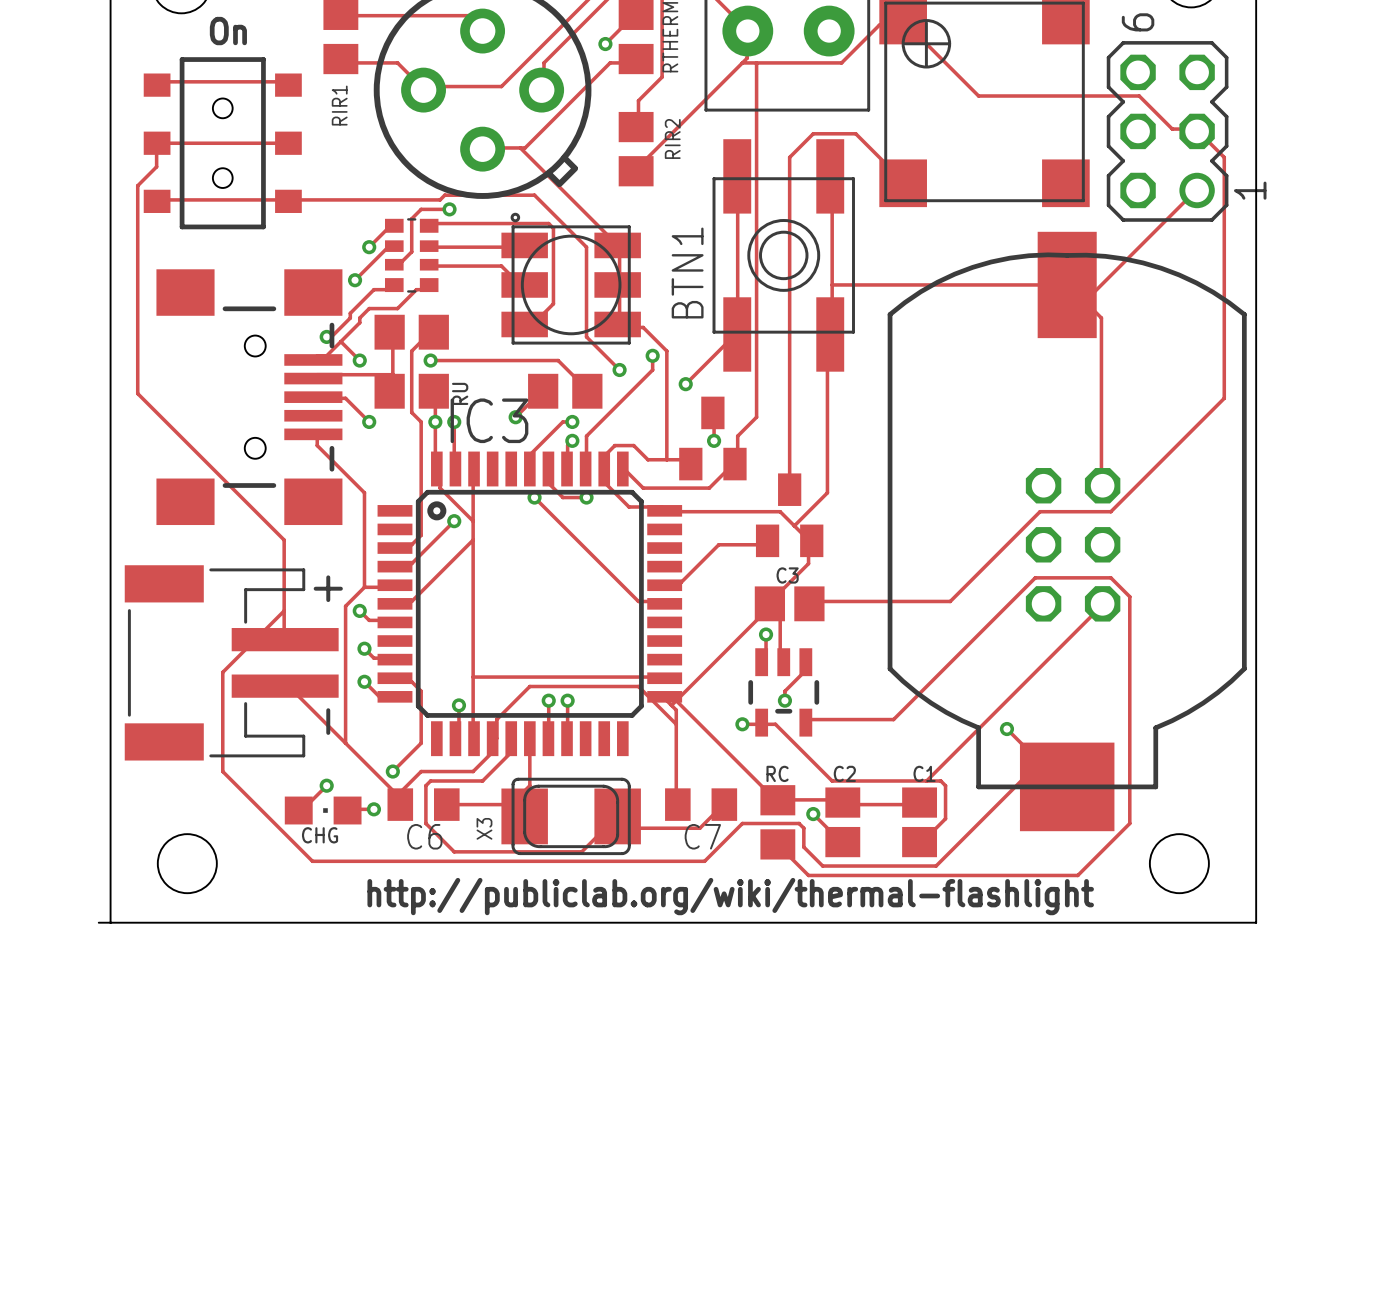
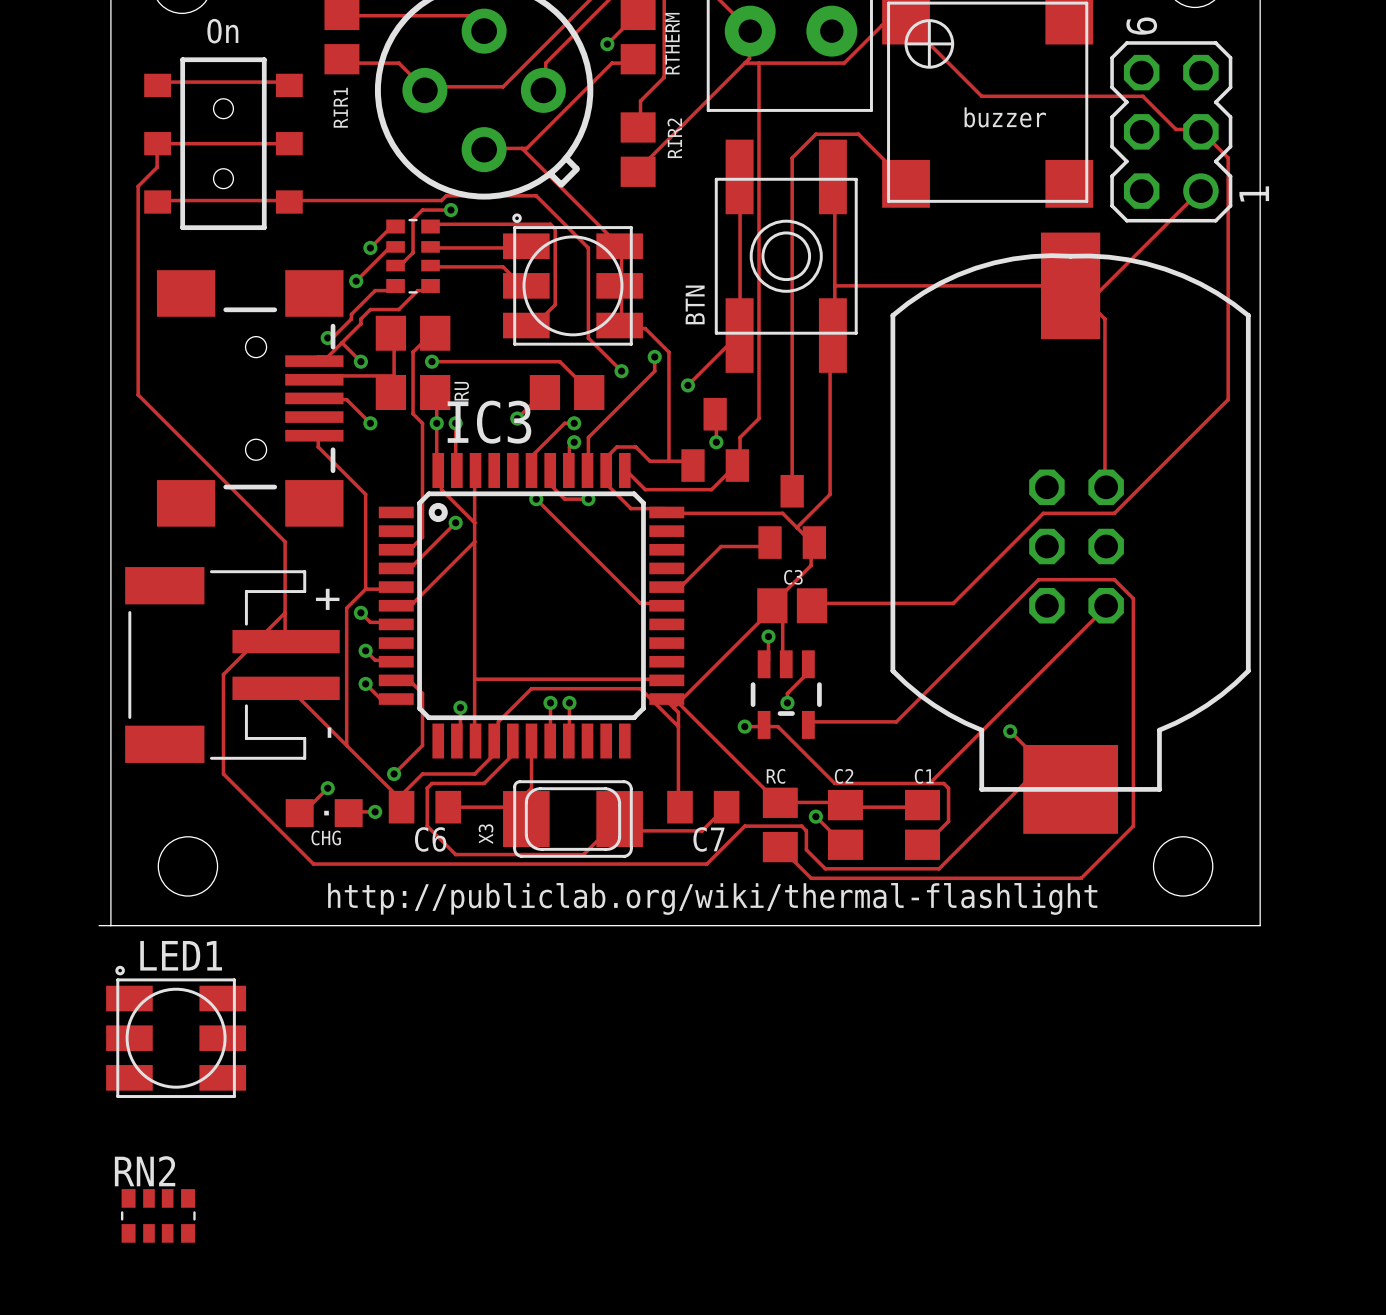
text: none -> buzzer (1005, 117)
BTN1 name: BTN1 (687, 273) -> BTN (695, 304)
LED1: none -> (176, 1031)
RN2: none -> (158, 1215)

